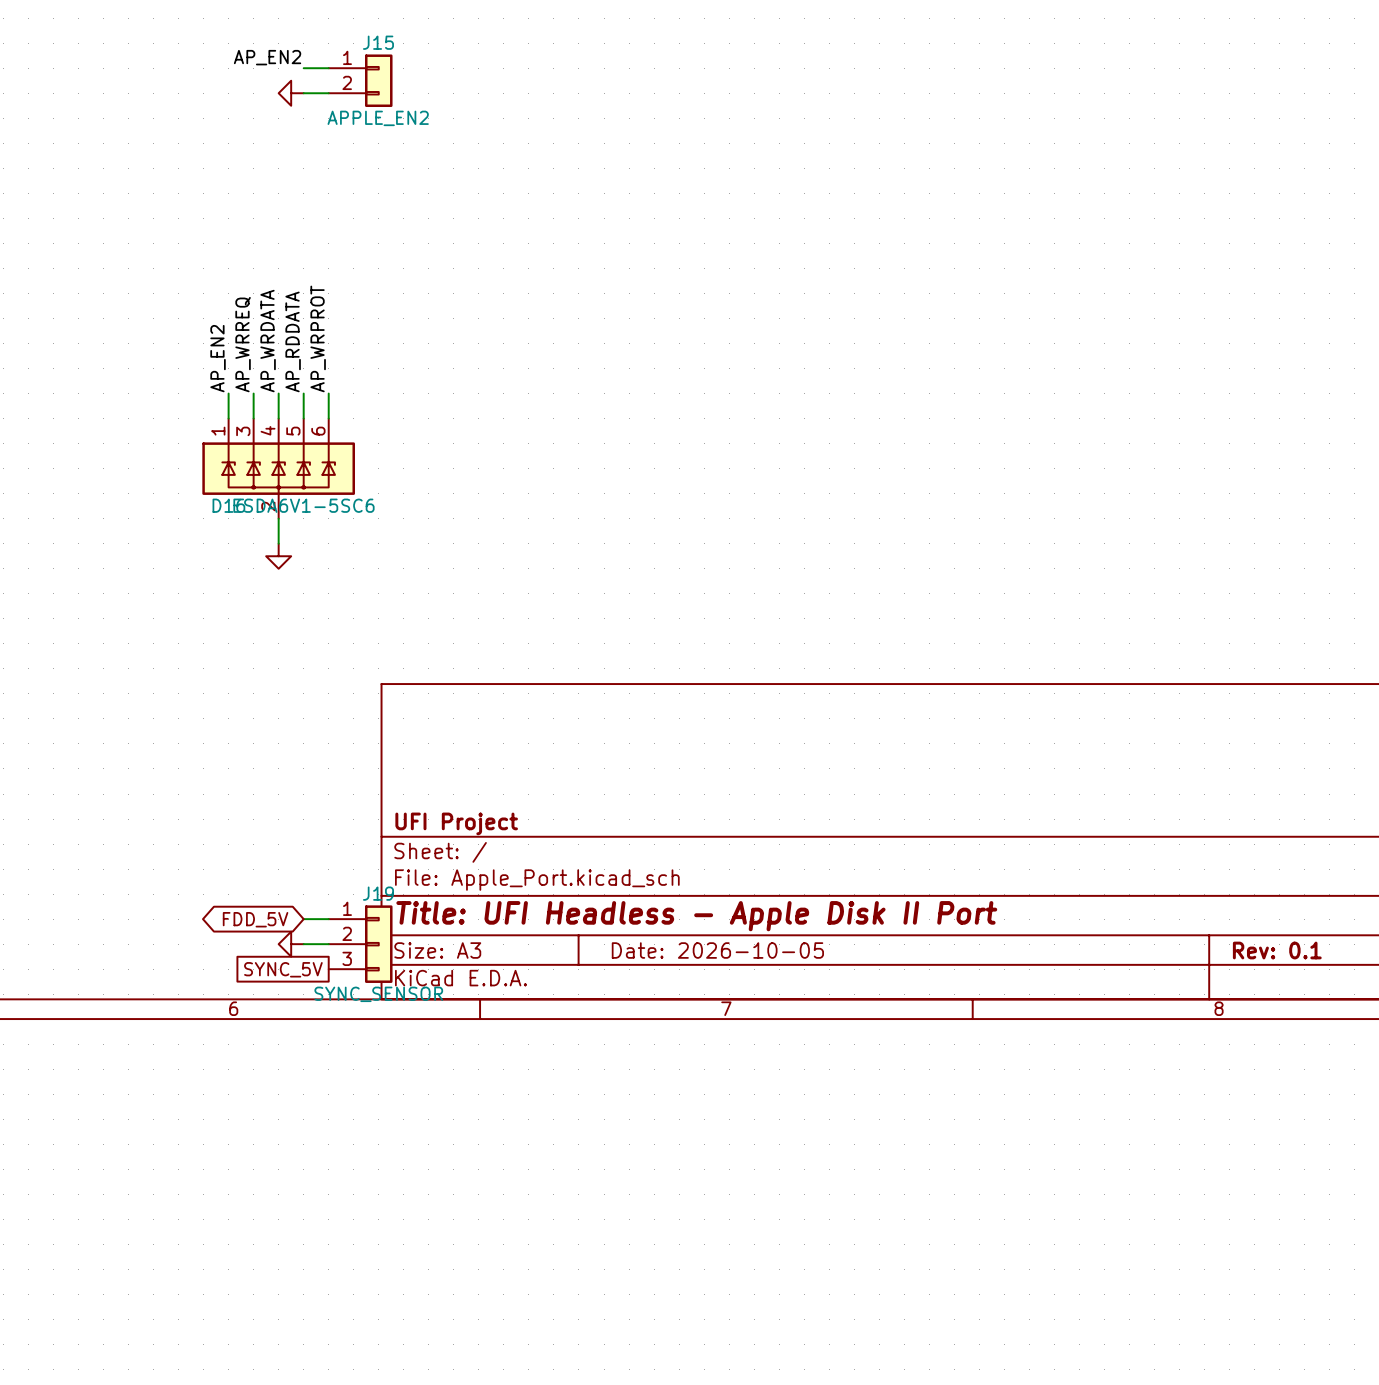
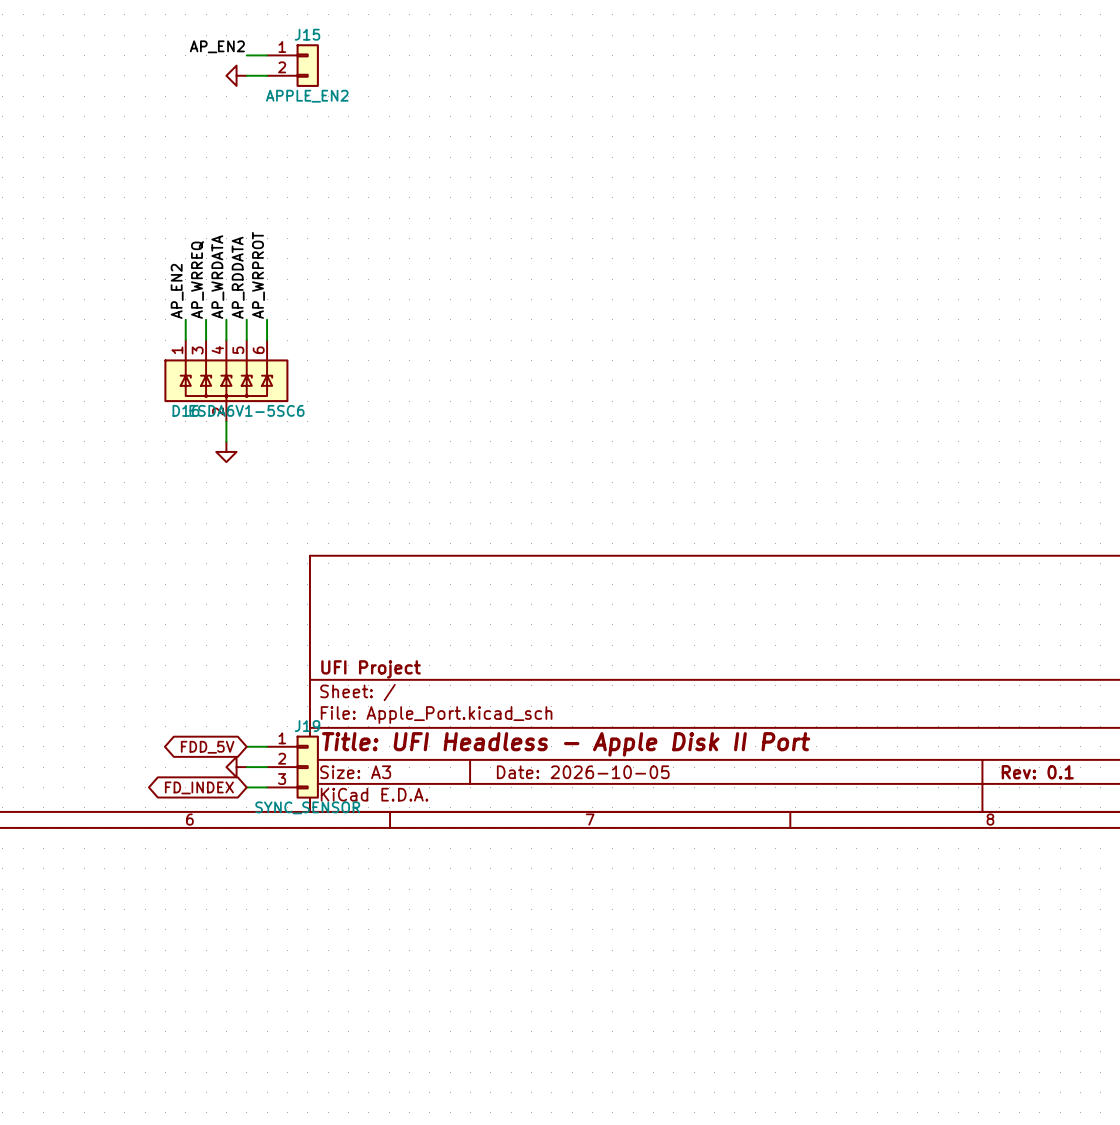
global label: none -> FD_INDEX (199, 787)
global label: SYNC_5V (283, 969) -> none
wire: none -> (246, 787) (267, 787)

